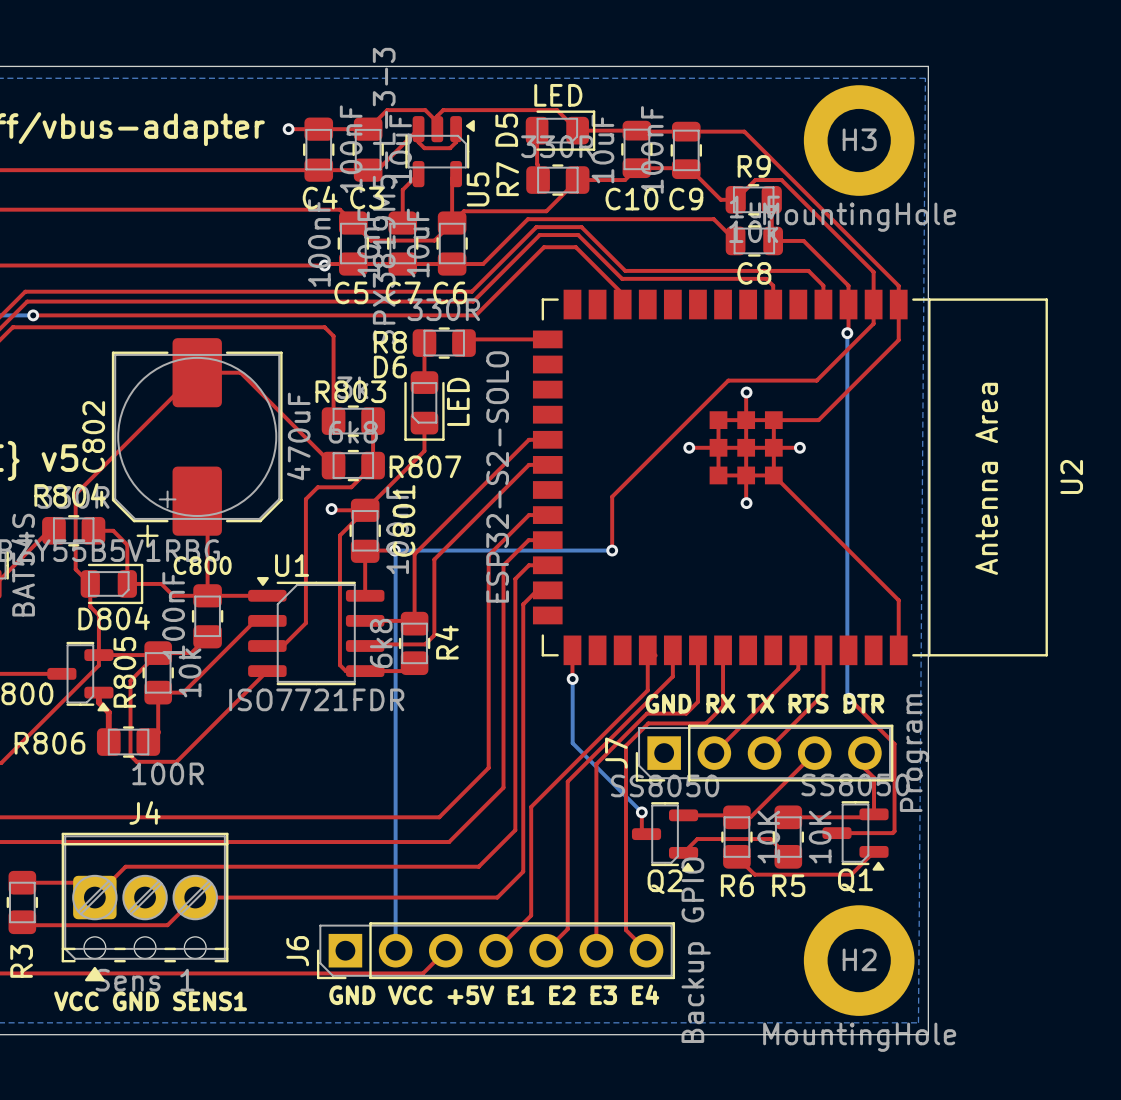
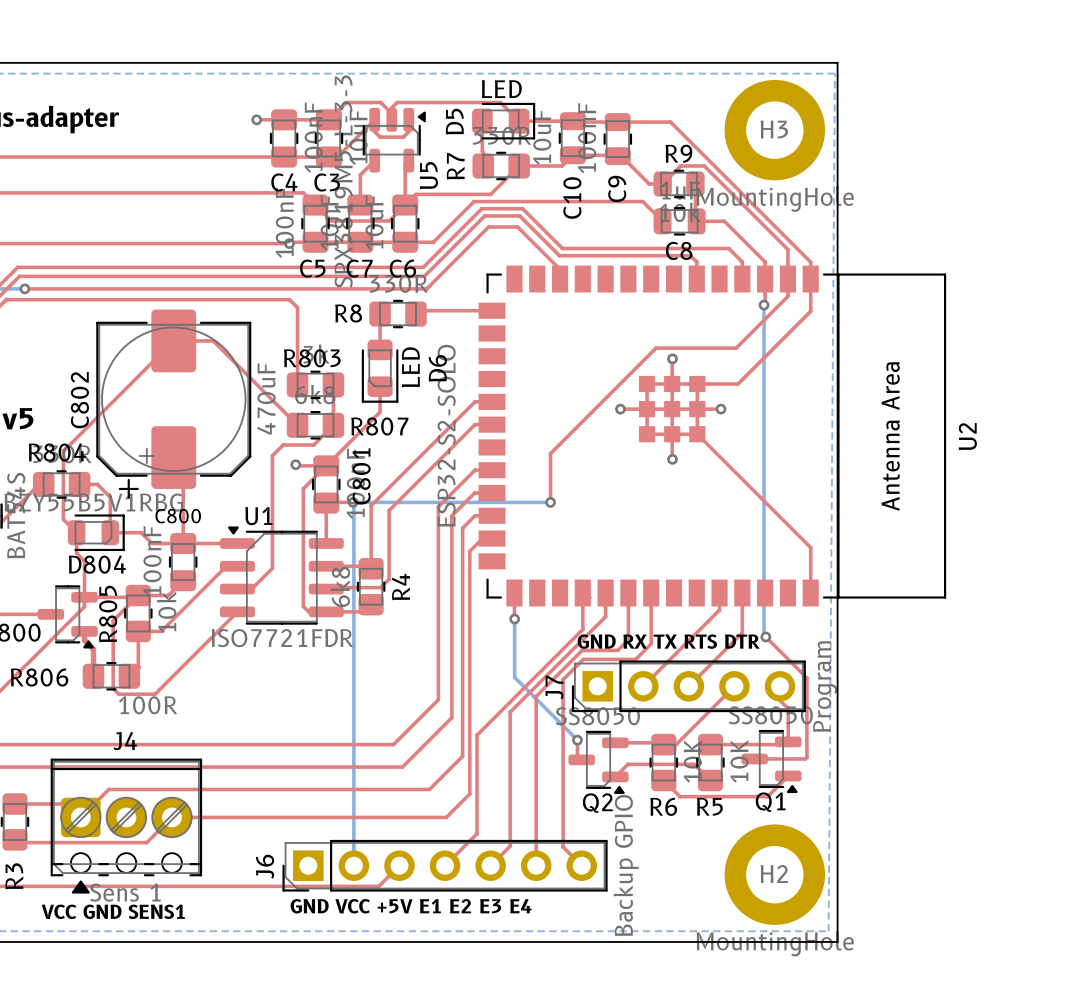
C10 name rotation: 0° (631, 199) -> 90° counterclockwise (572, 198)
C9 name rotation: 0° (686, 199) -> 90° counterclockwise (617, 188)
D6 name rotation: 0° (390, 367) -> 90° counterclockwise (437, 368)
D6 name position: D6 (390, 367) -> D6 (437, 368)

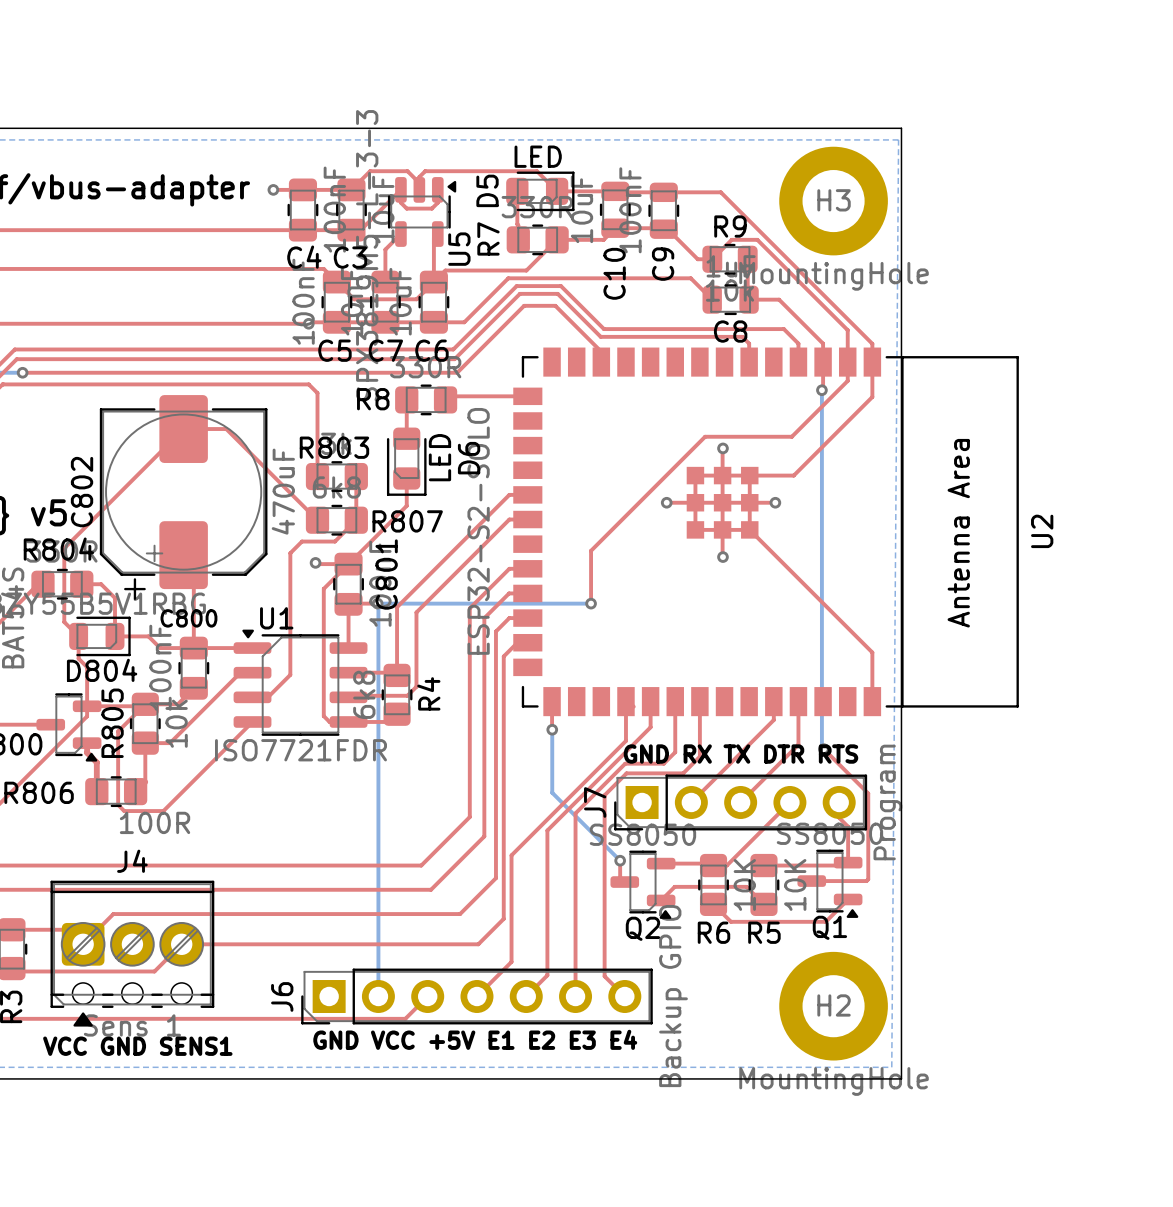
text: GND RX TX RTS DTR (668, 641) -> GND RX TX DTR RTS (740, 754)

